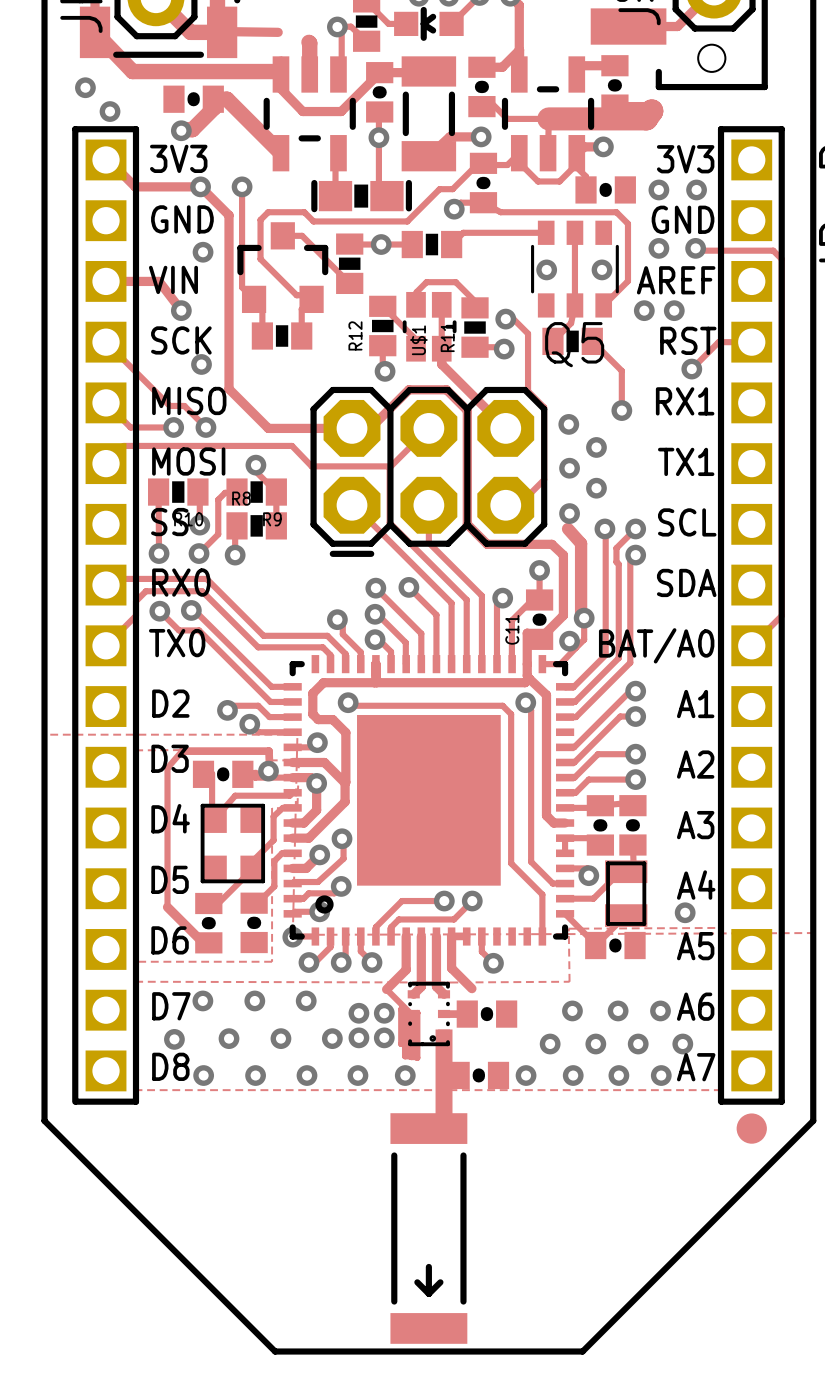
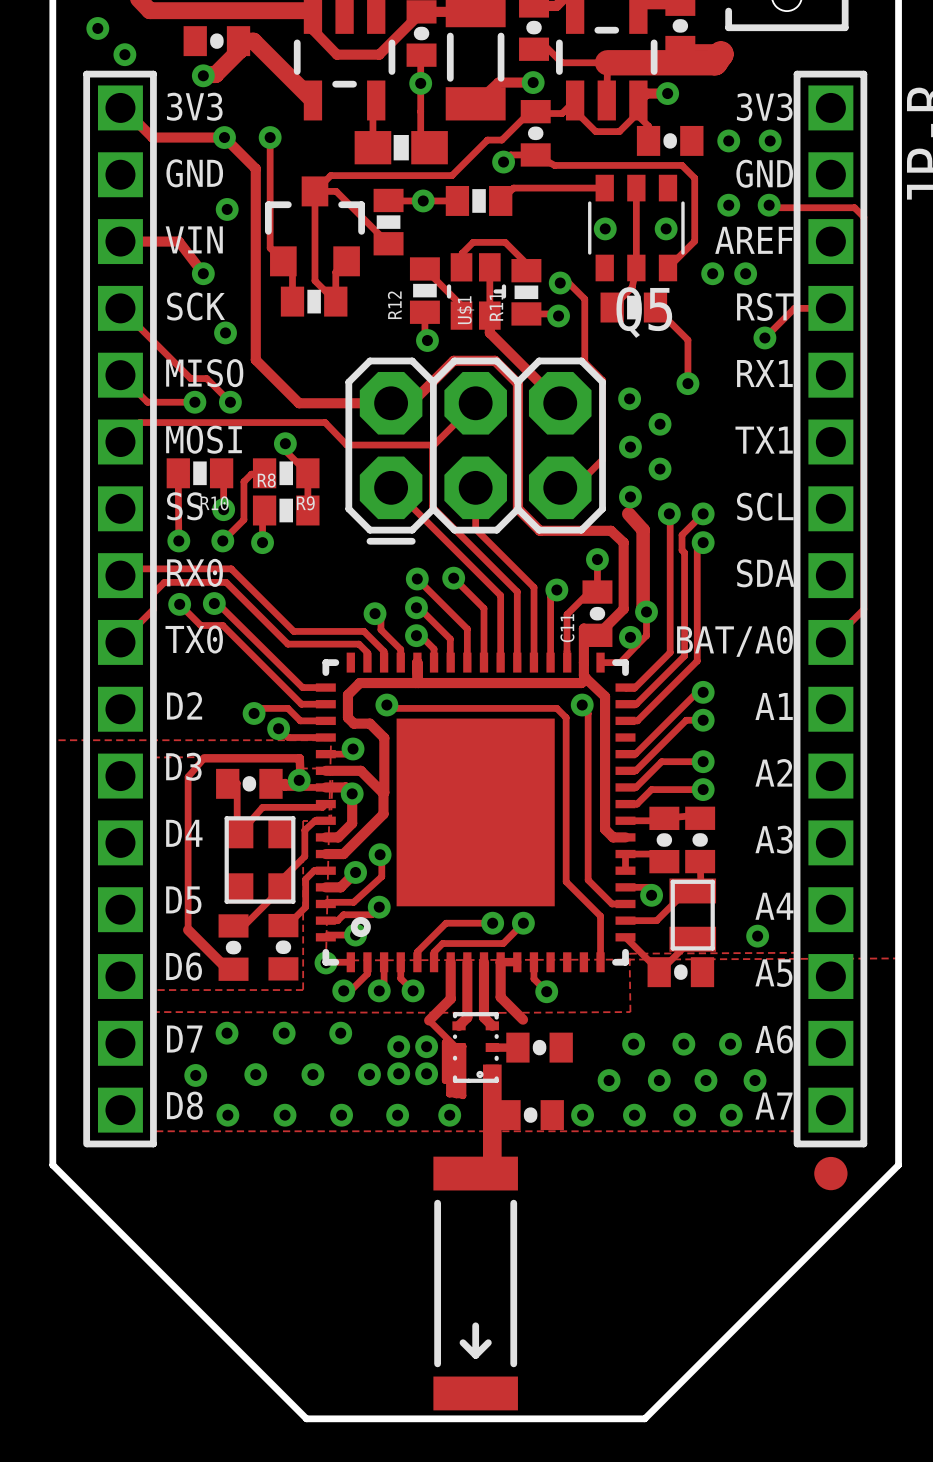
line: (314, 183) (314, 209) -> none
line: (408, 183) (408, 208) -> none
track: (313, 221) (304, 212) (268, 212) (260, 219) (260, 259) (296, 295) (308, 295) (312, 299) -> (348, 175) (330, 175) (314, 191) (314, 280) (335, 301)

